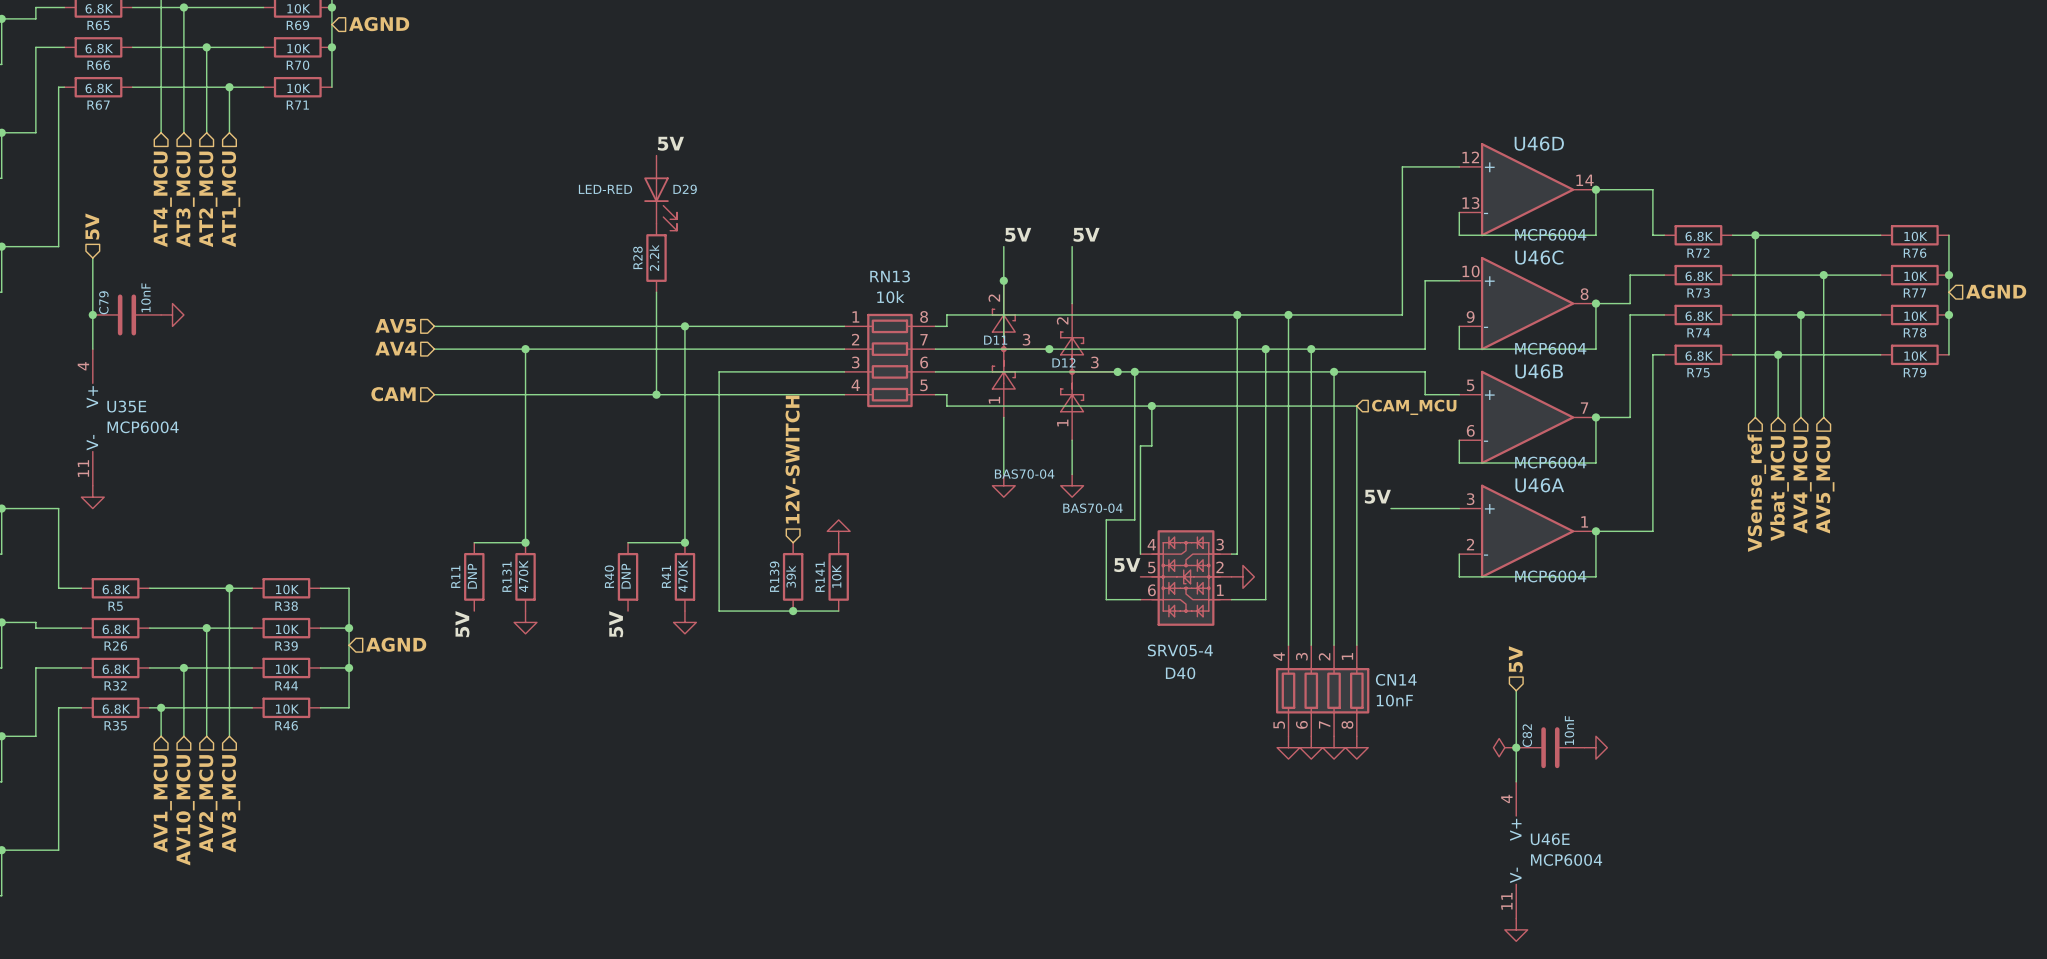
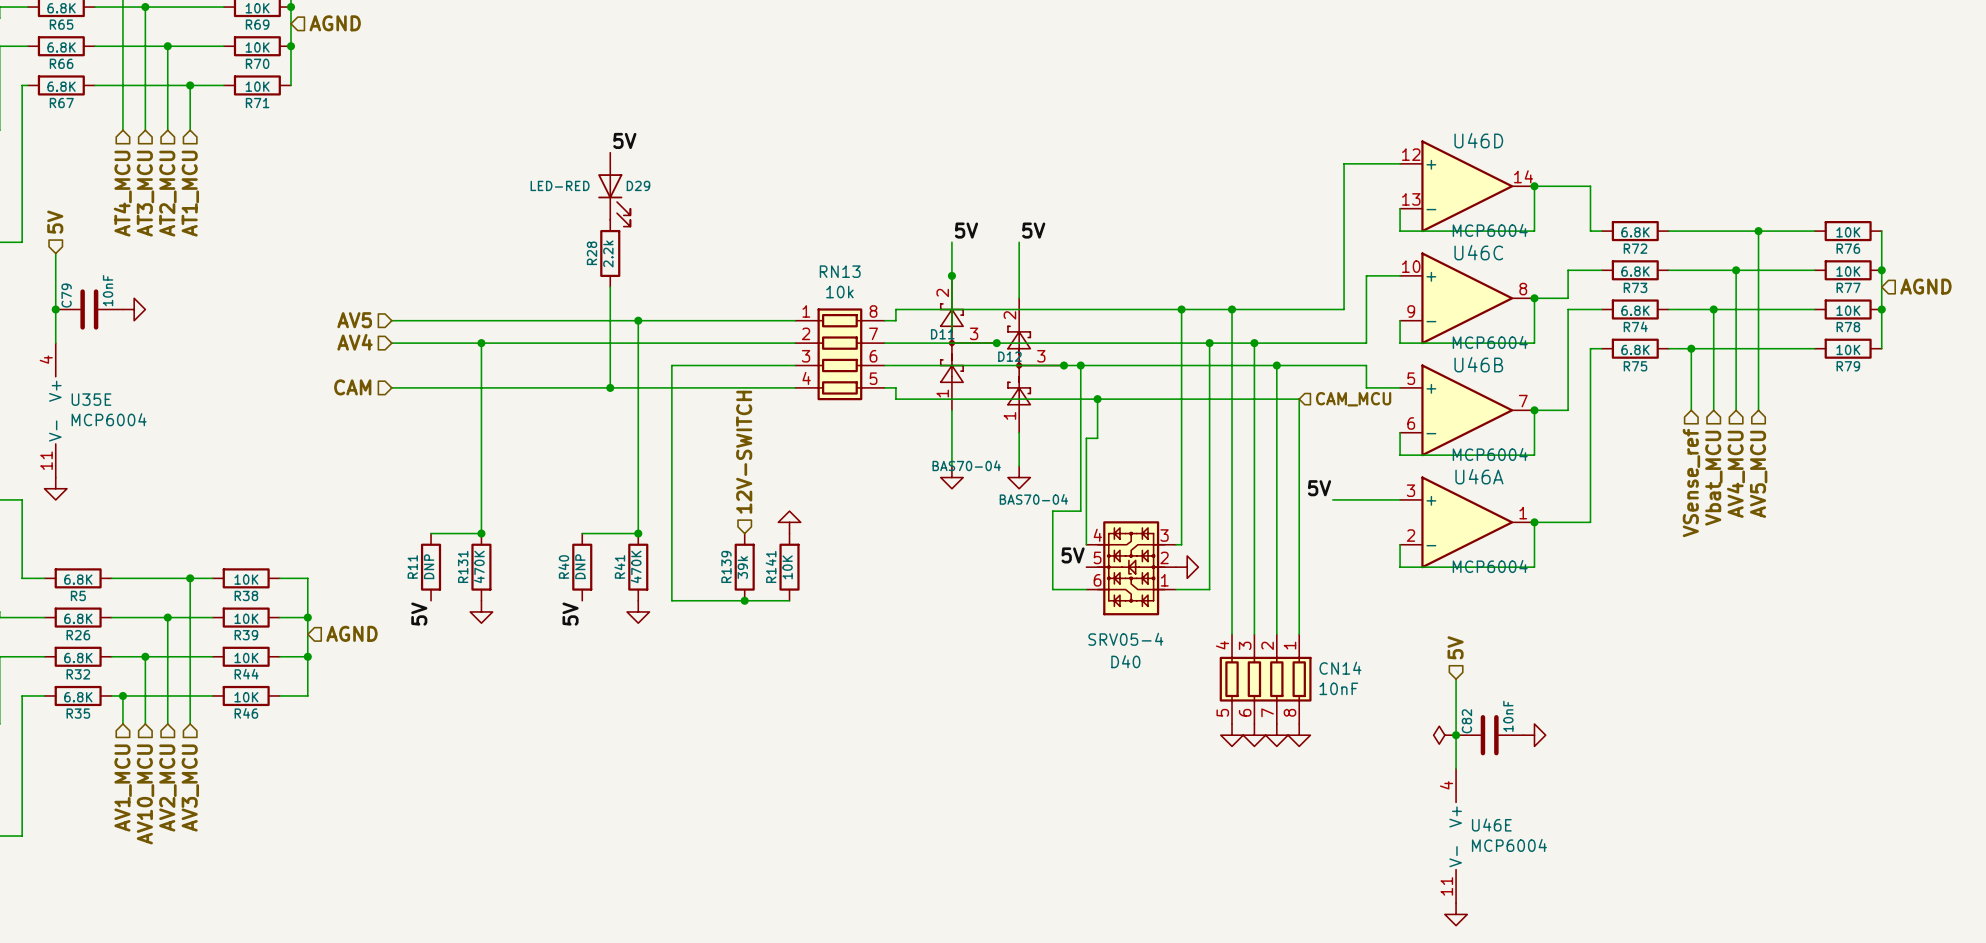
wire: (1755, 235) (1755, 354) -> none
junction: (1755, 235) -> none
wire: none -> (1758, 231) (1758, 270)
junction: none -> (1758, 231)
wire: none -> (1736, 270) (1736, 309)
junction: none -> (1736, 270)
junction: (1823, 275) -> none
wire: none -> (1713, 309) (1713, 348)
junction: none -> (1713, 309)
junction: (1800, 314) -> none
junction: none -> (1691, 348)
junction: (1778, 354) -> none

